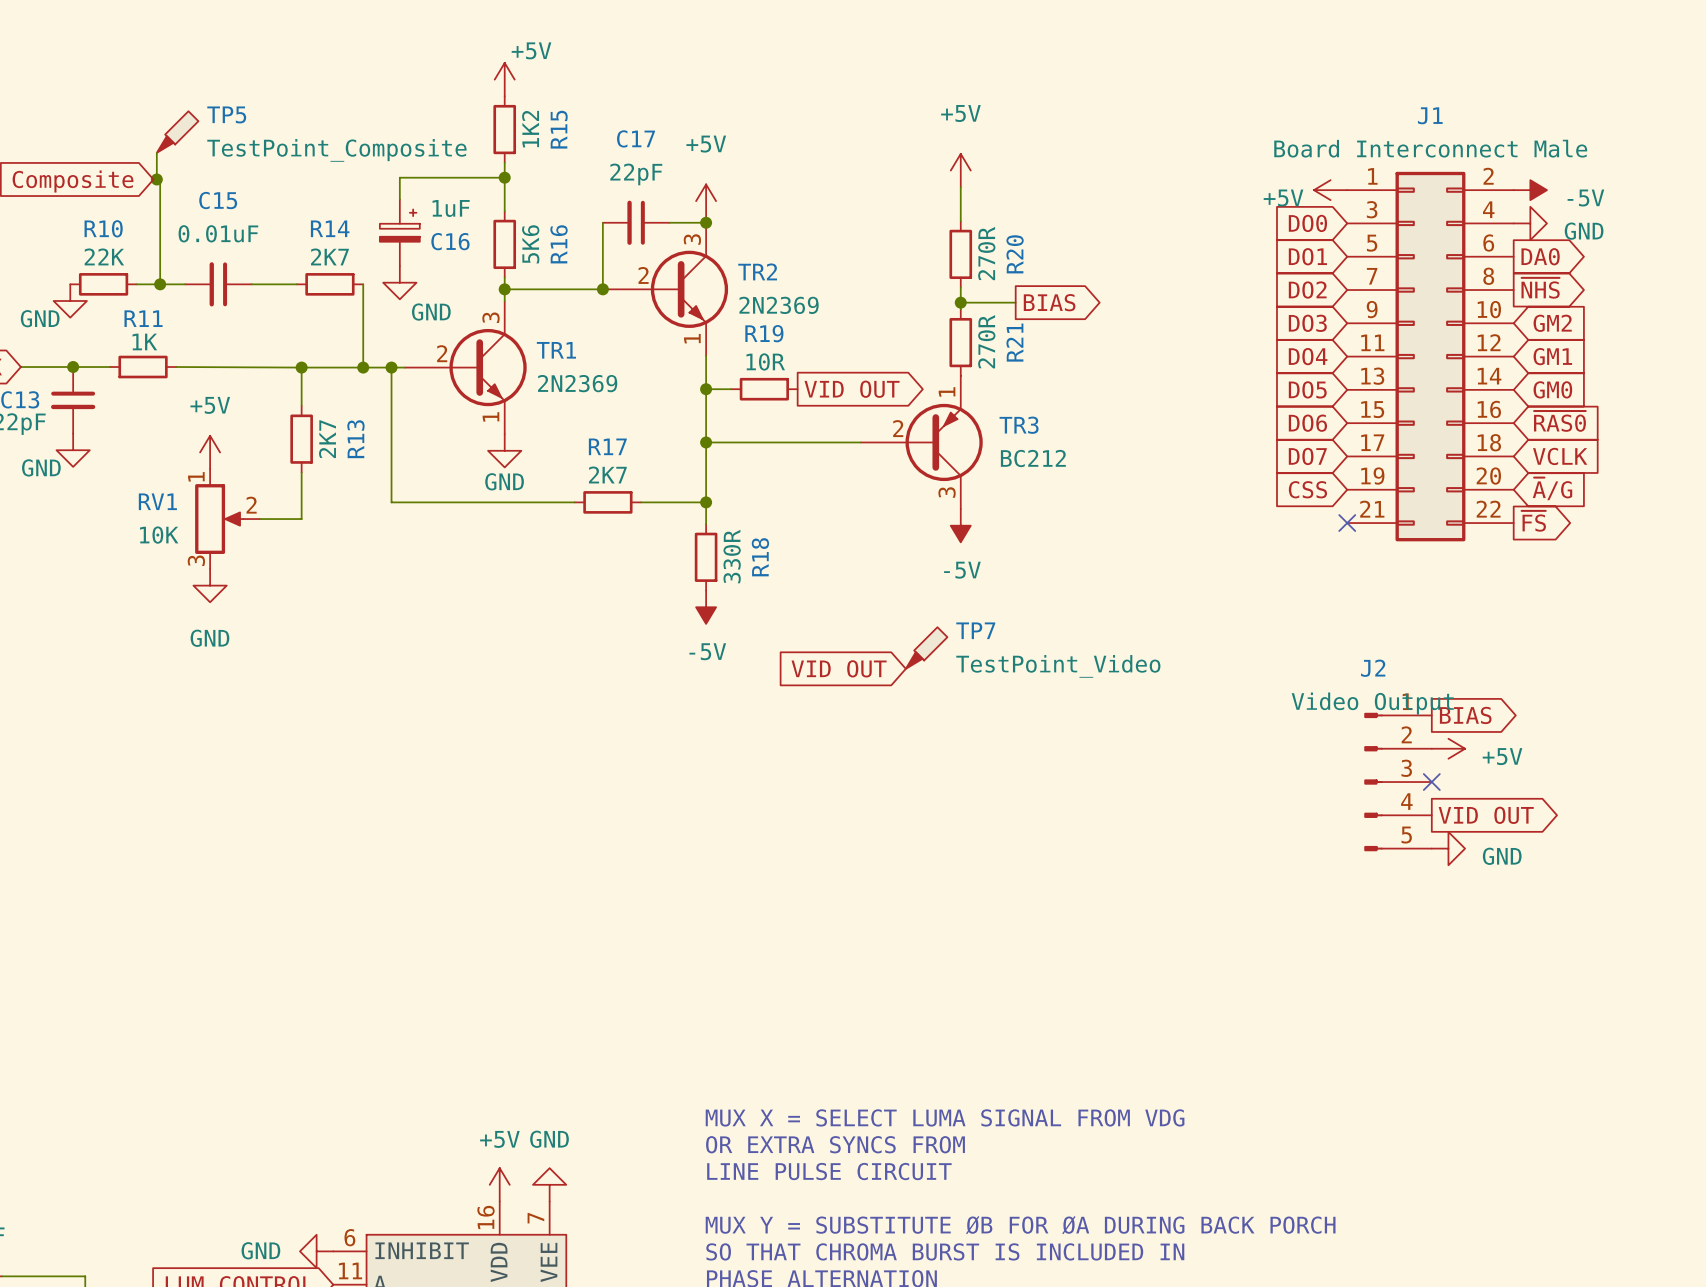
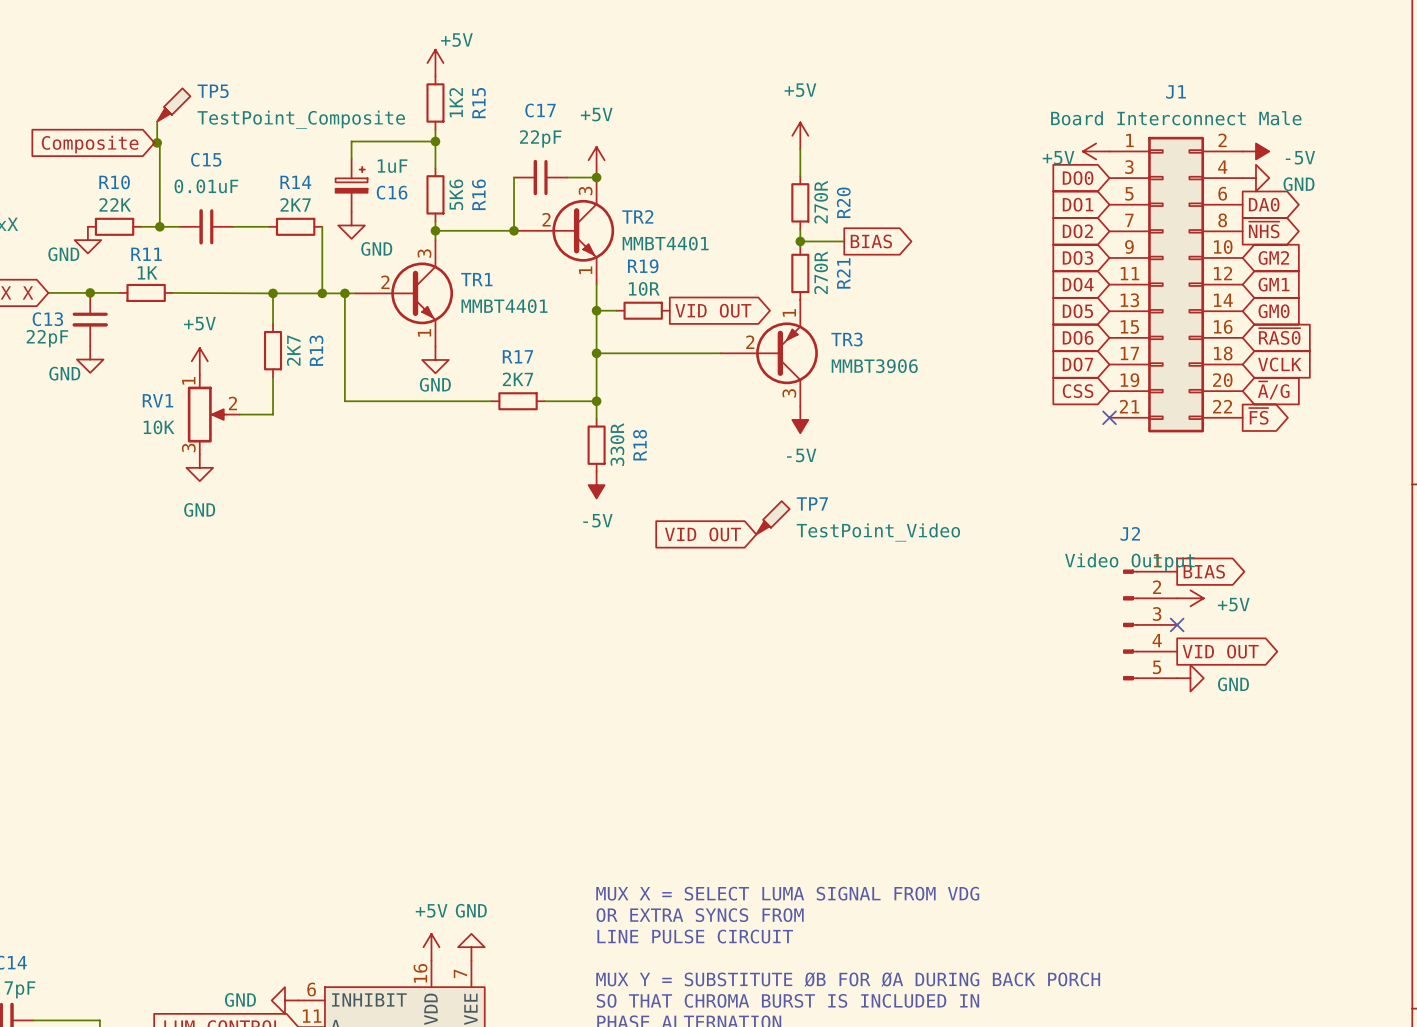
TR2 value: 2N2369 (779, 305) -> MMBT4401 (665, 243)
TR1 value: 2N2369 (577, 383) -> MMBT4401 (504, 306)
TR3 value: BC212 (1033, 458) -> MMBT3906 (874, 366)

